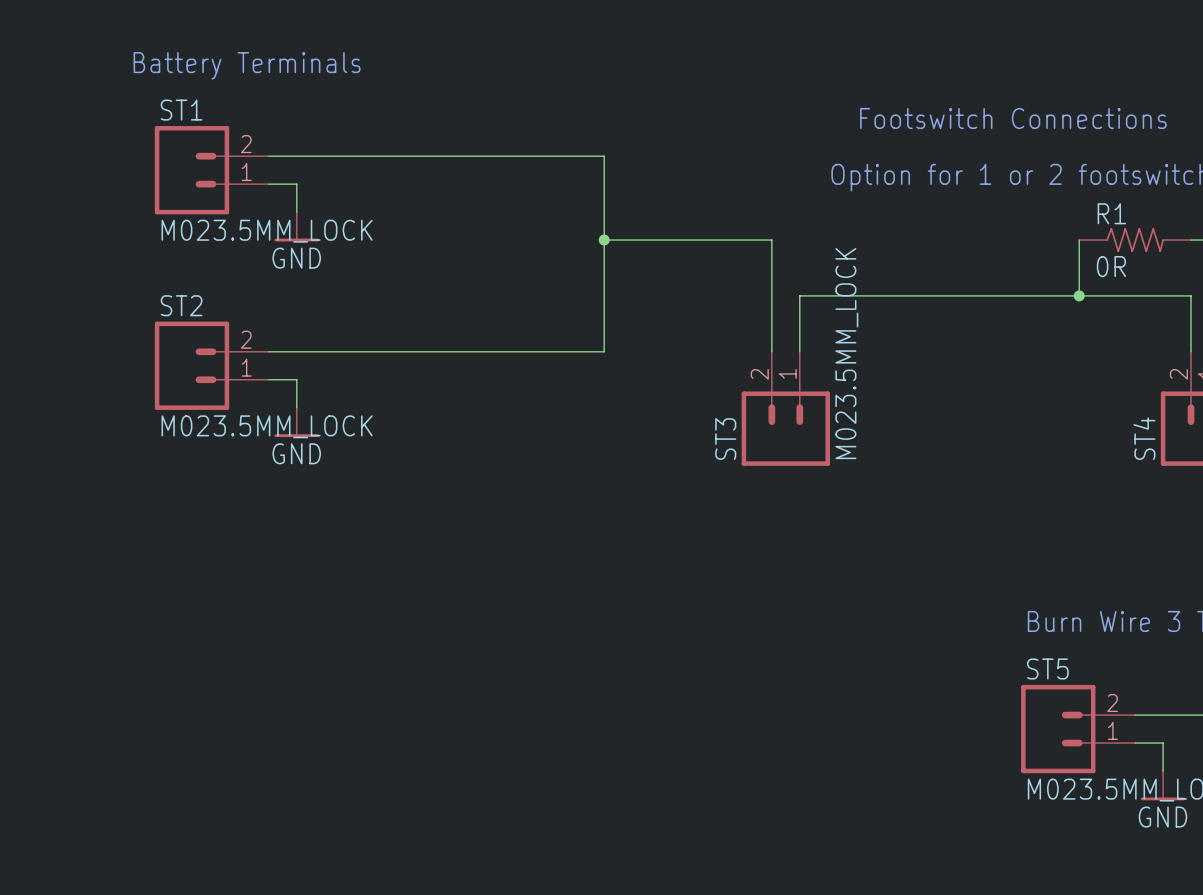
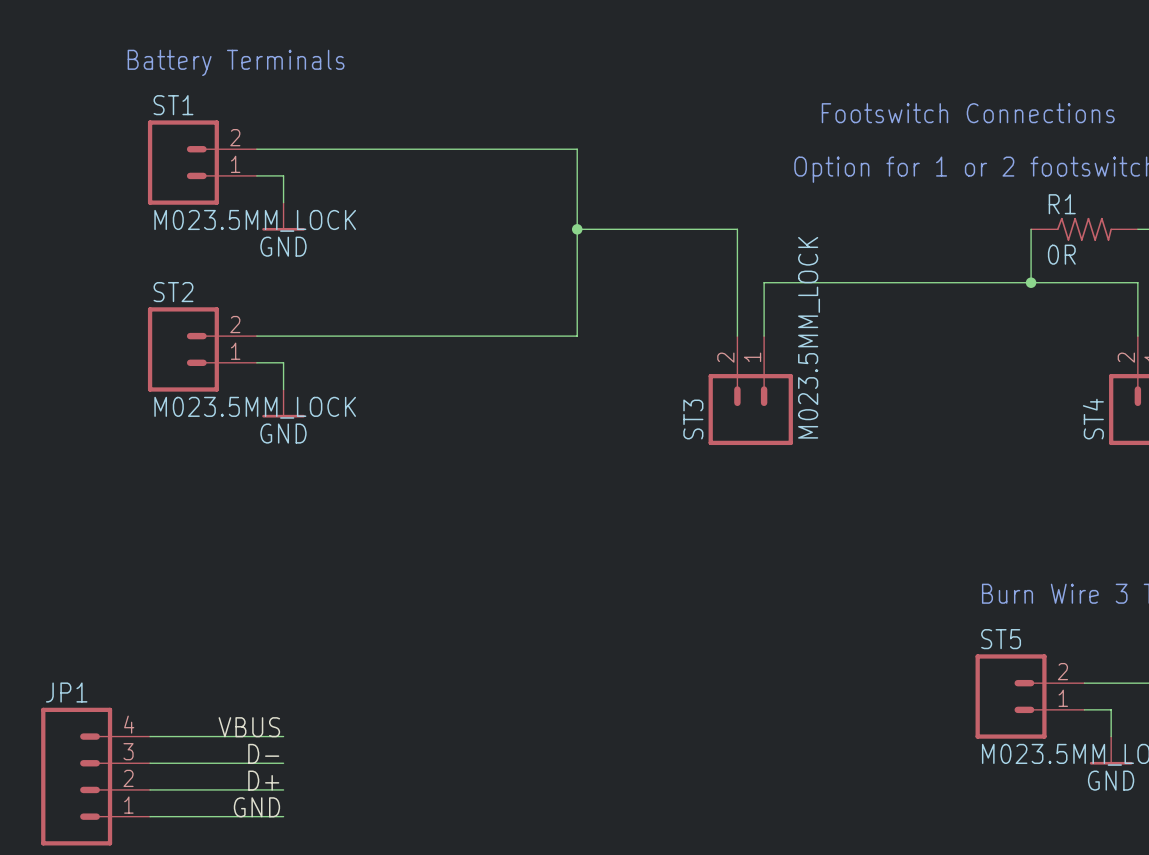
label: none -> VBUS (249, 727)
wire: none -> (150, 736) (283, 736)
label: none -> D- (263, 753)
wire: none -> (150, 763) (283, 763)
JP1: none -> (95, 776)
label: none -> D+ (263, 780)
wire: none -> (150, 789) (283, 789)
label: none -> GND (256, 807)
wire: none -> (150, 816) (283, 816)

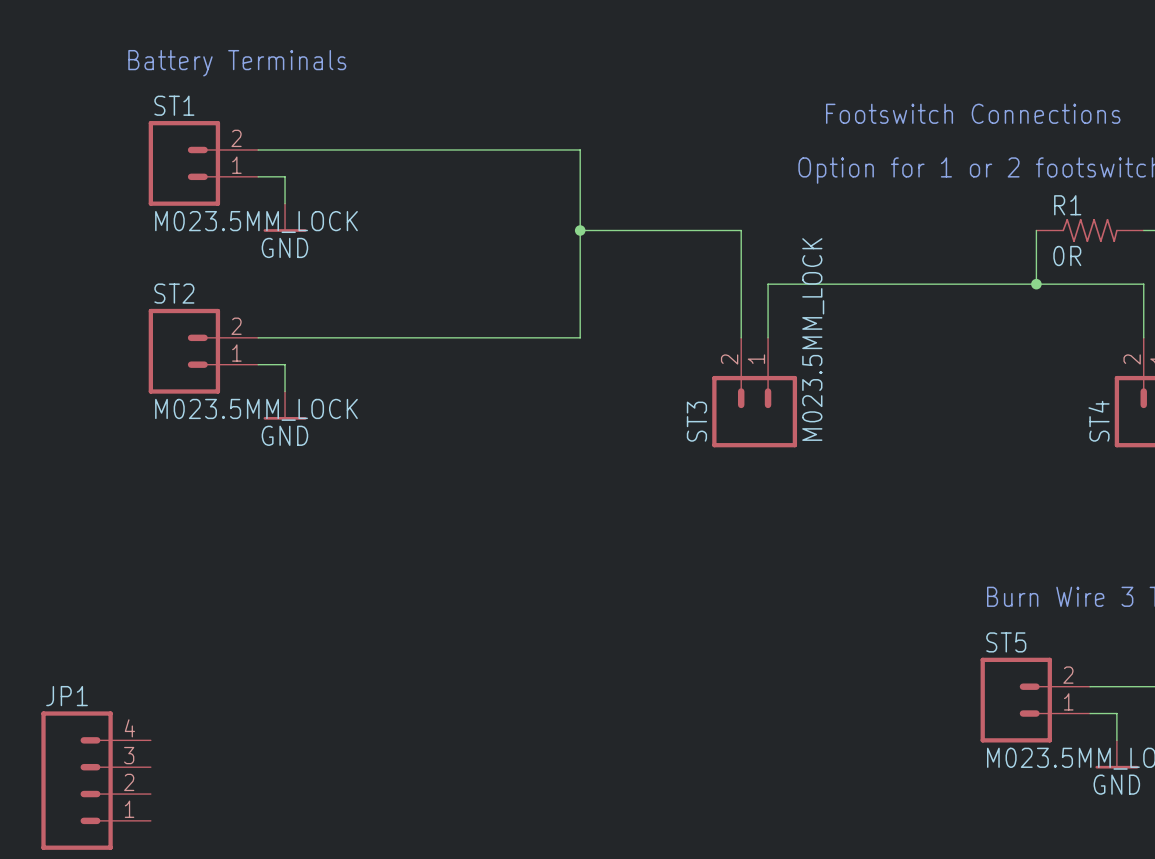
label: VBUS (249, 727) -> none
wire: (150, 736) (283, 736) -> none
label: D- (263, 753) -> none
wire: (150, 763) (283, 763) -> none
label: D+ (263, 780) -> none
wire: (150, 789) (283, 789) -> none
label: GND (256, 807) -> none
wire: (150, 816) (283, 816) -> none

